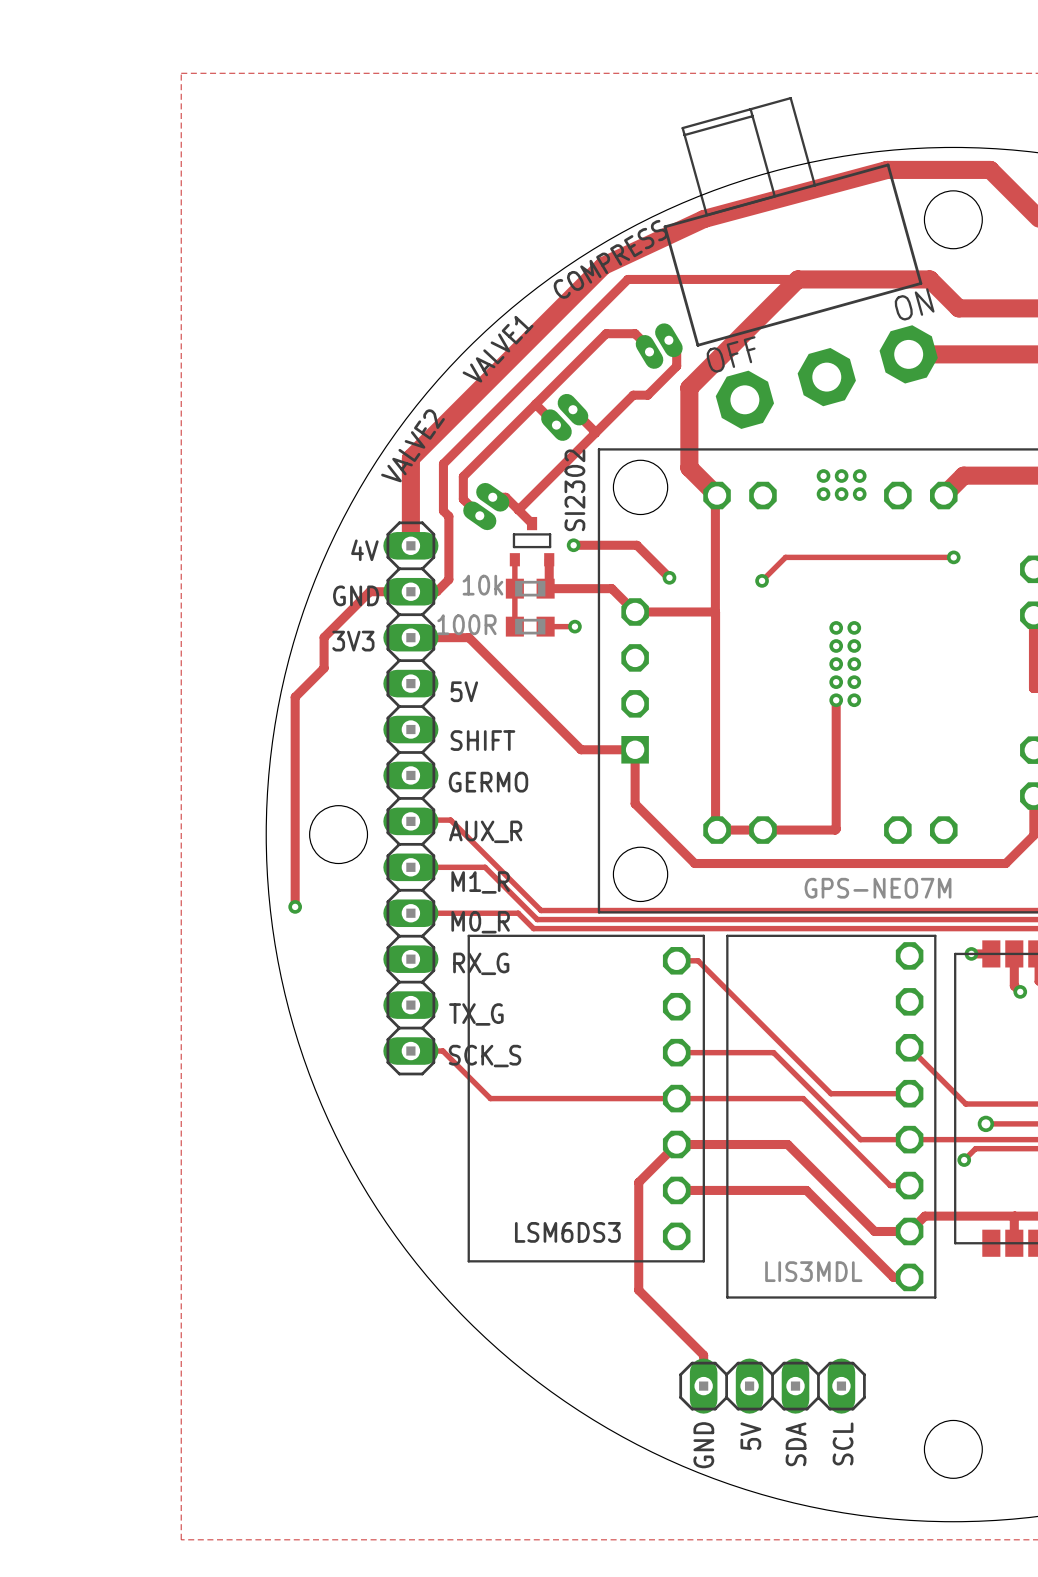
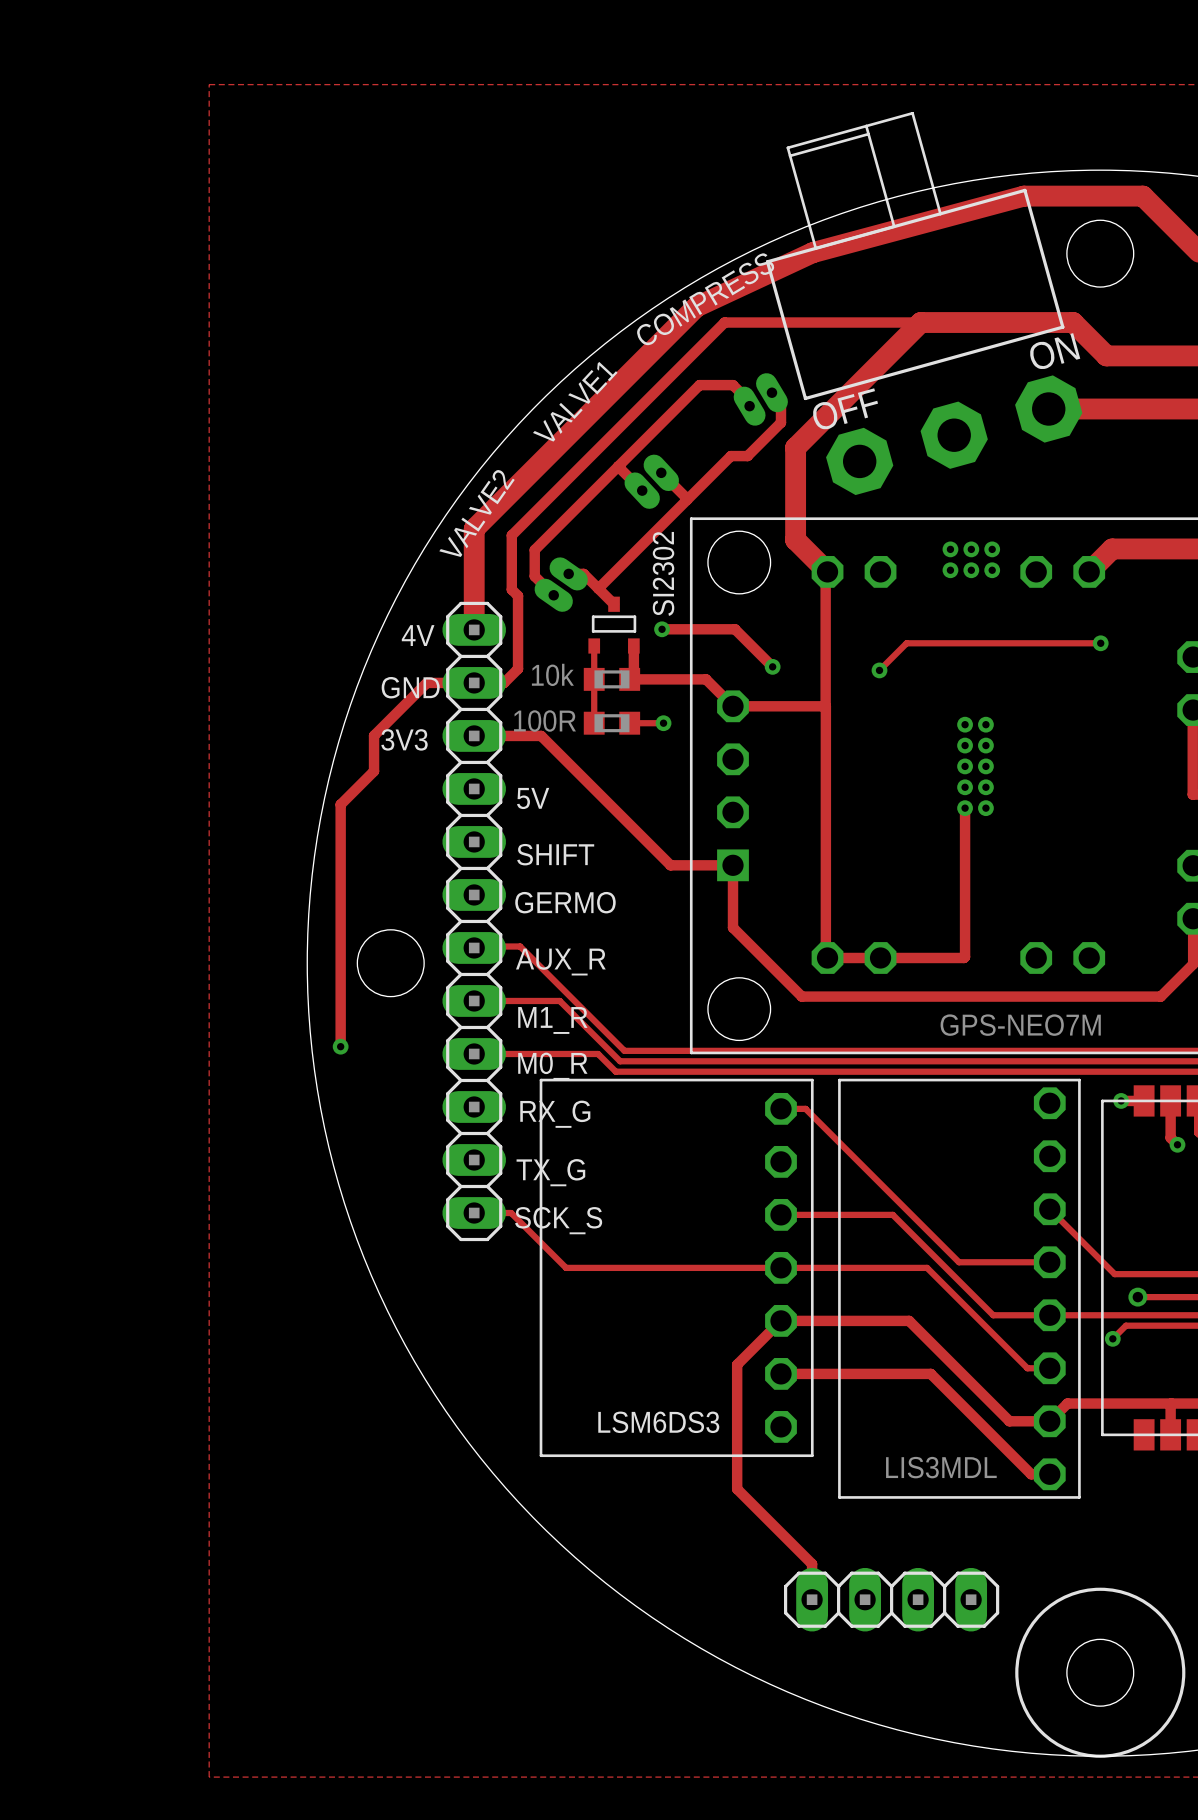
drawing: none -> [1015, 1587, 1186, 1758]
text: 5V (750, 1436) -> none
text: SCL (843, 1443) -> none
text: SDA (796, 1444) -> none
text: GND (703, 1445) -> none

